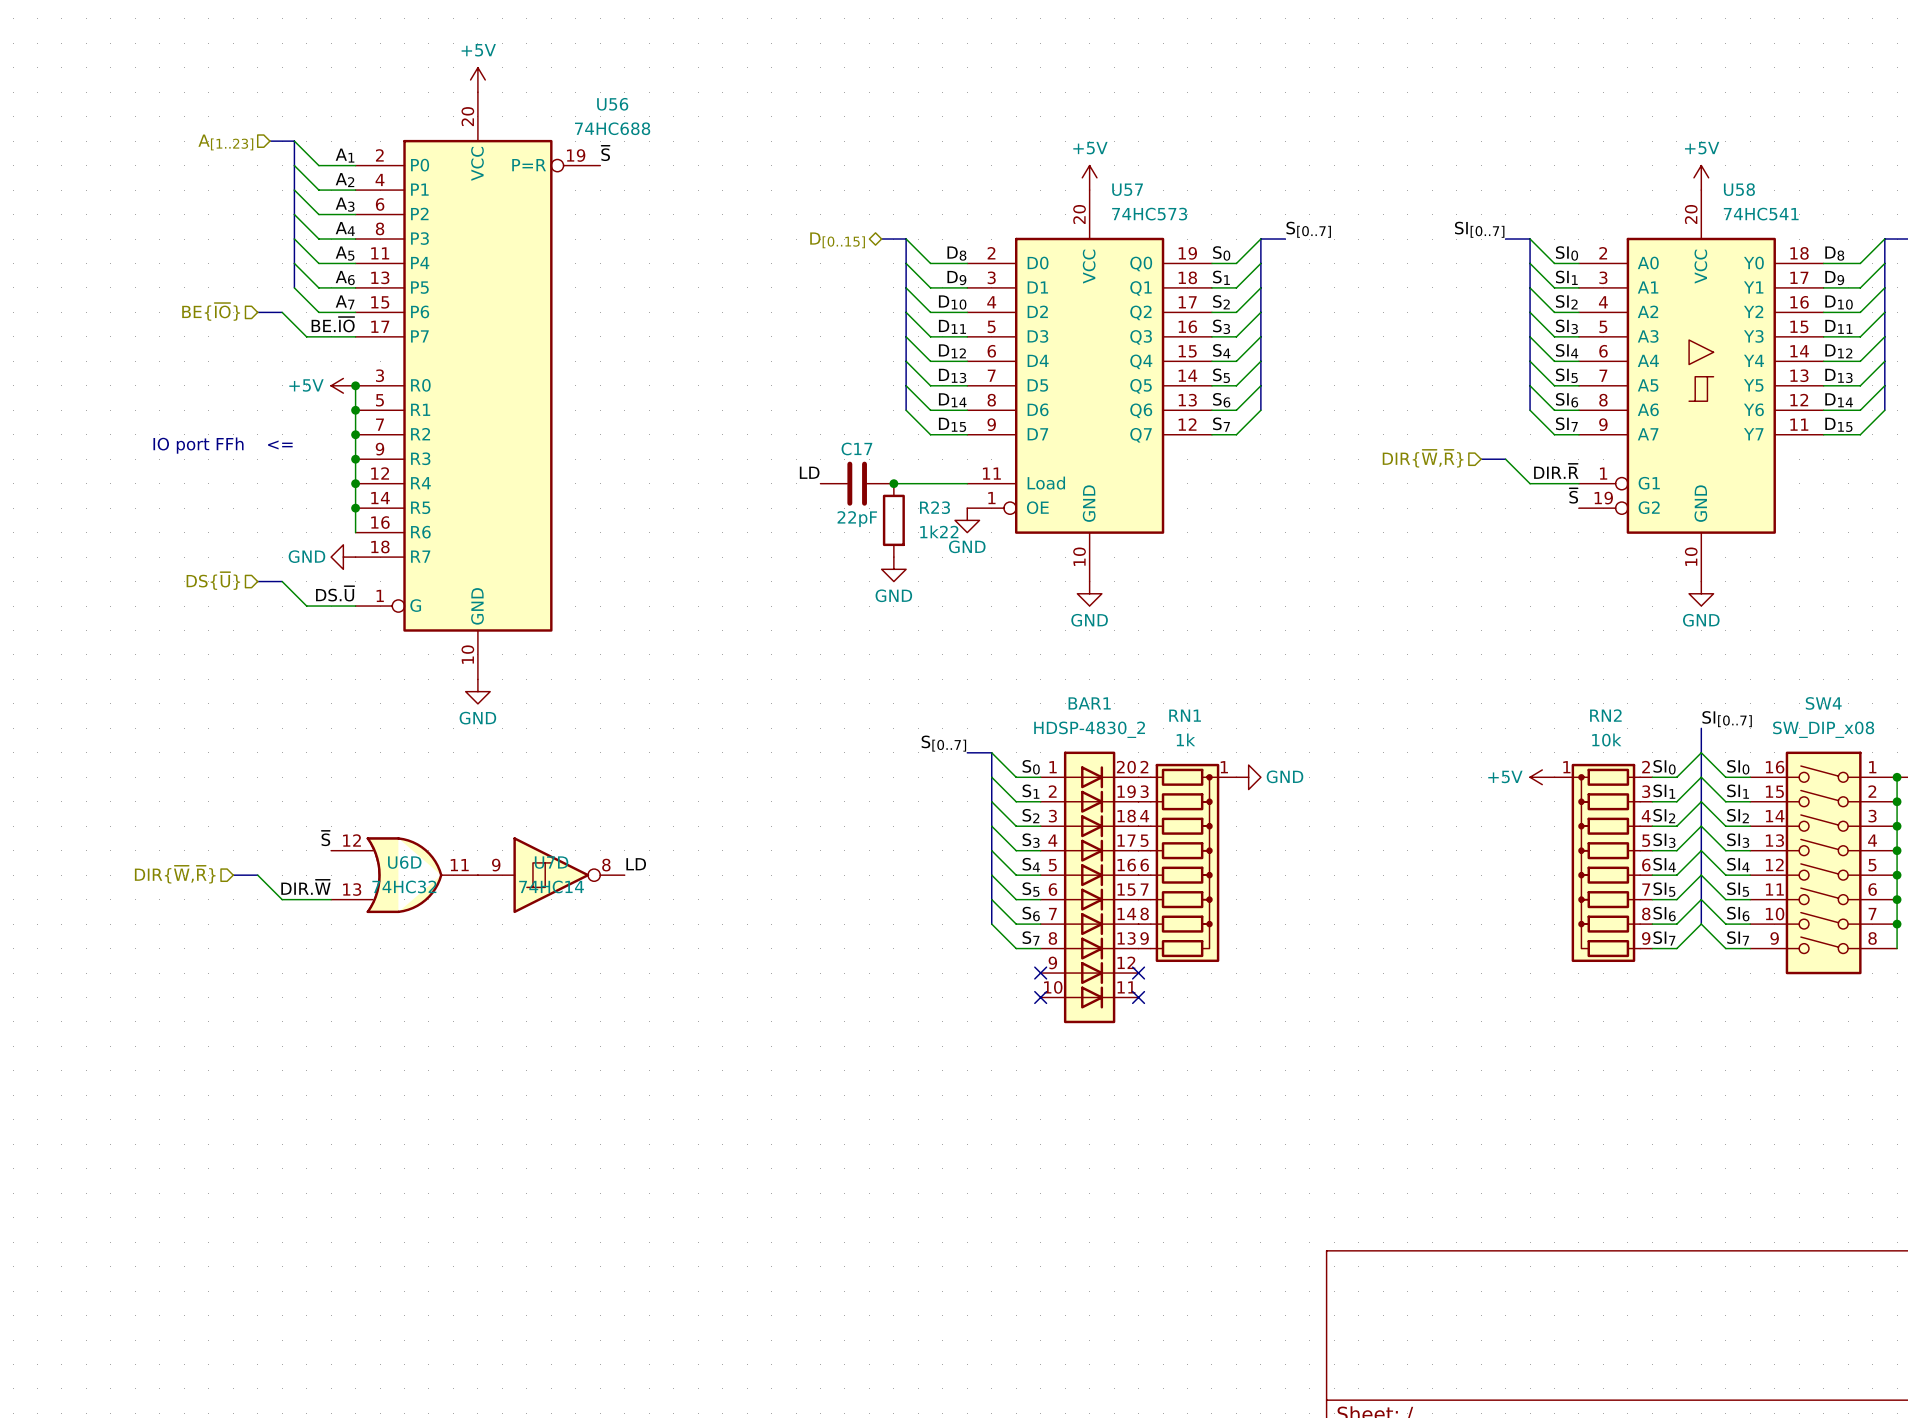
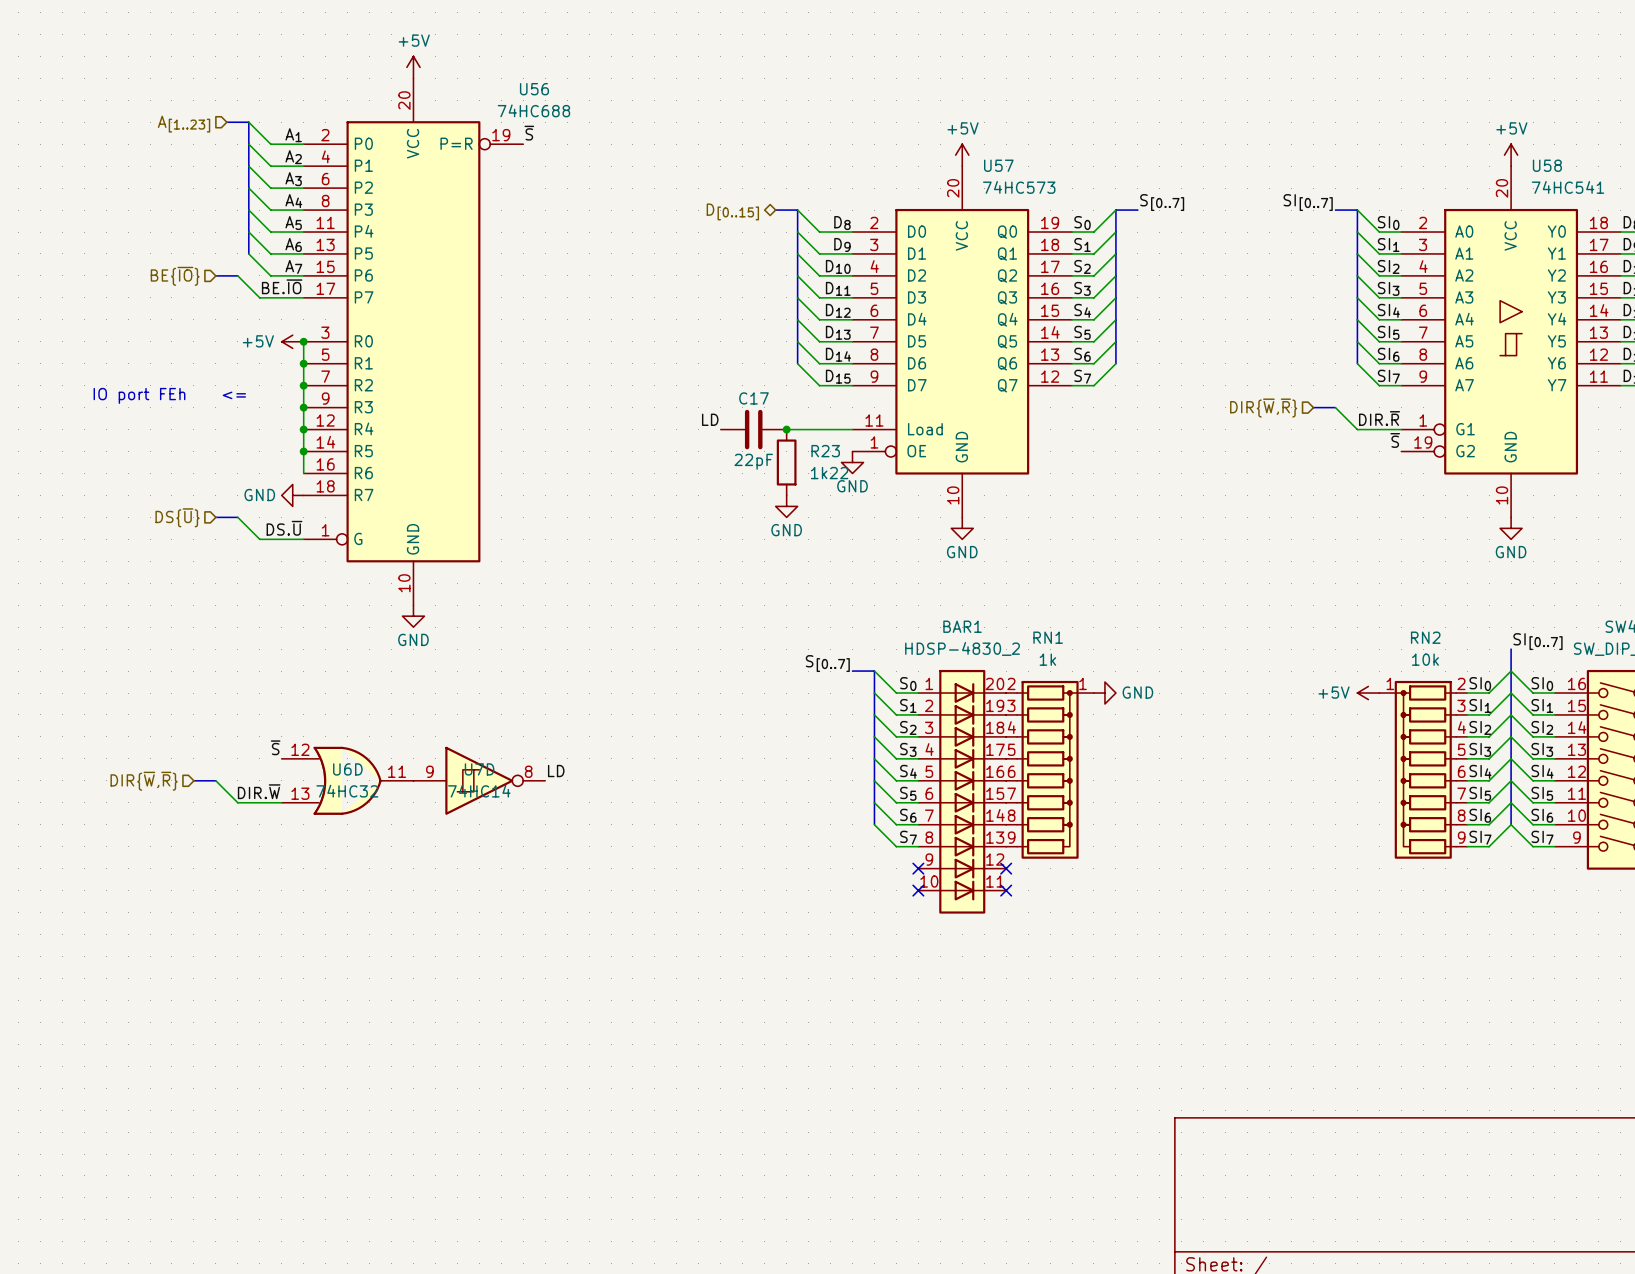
text: IO port FFh <= (223, 445) -> IO port FEh <= (169, 395)

